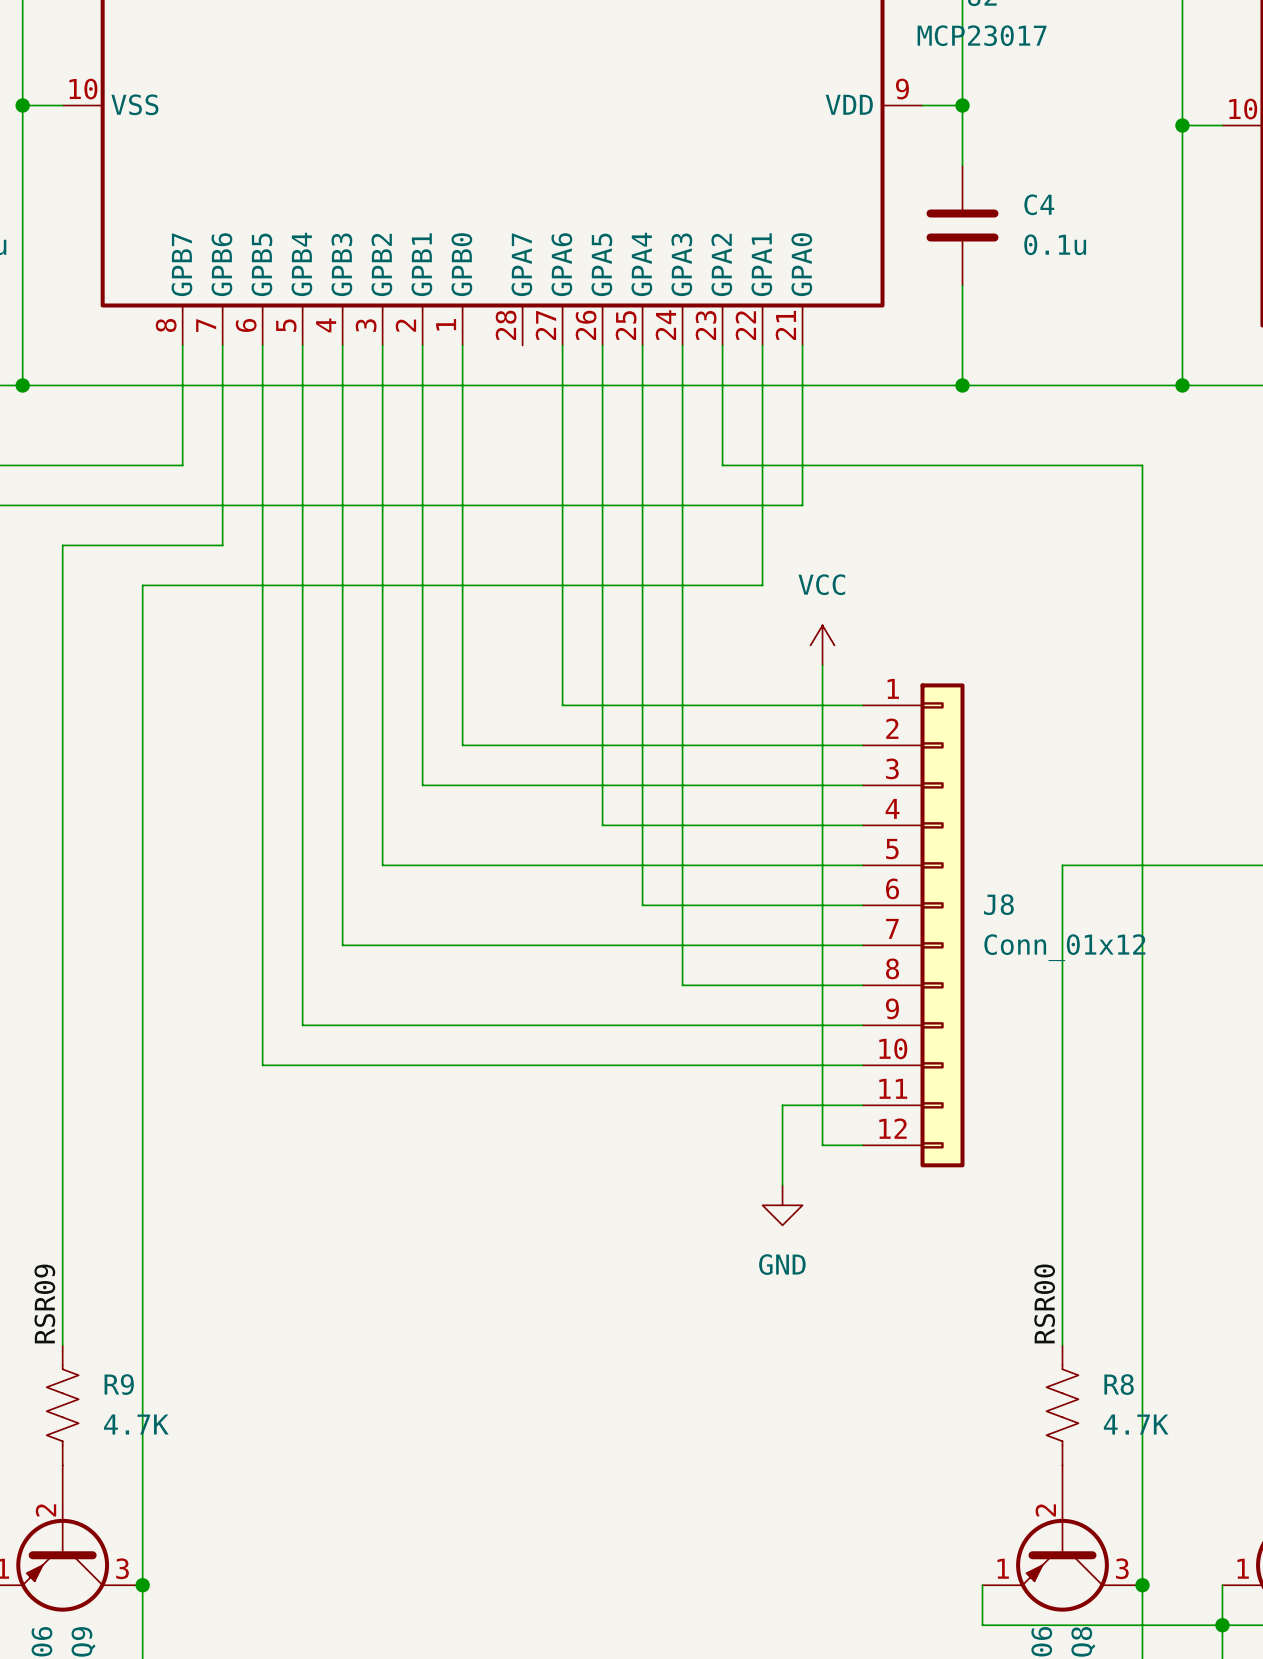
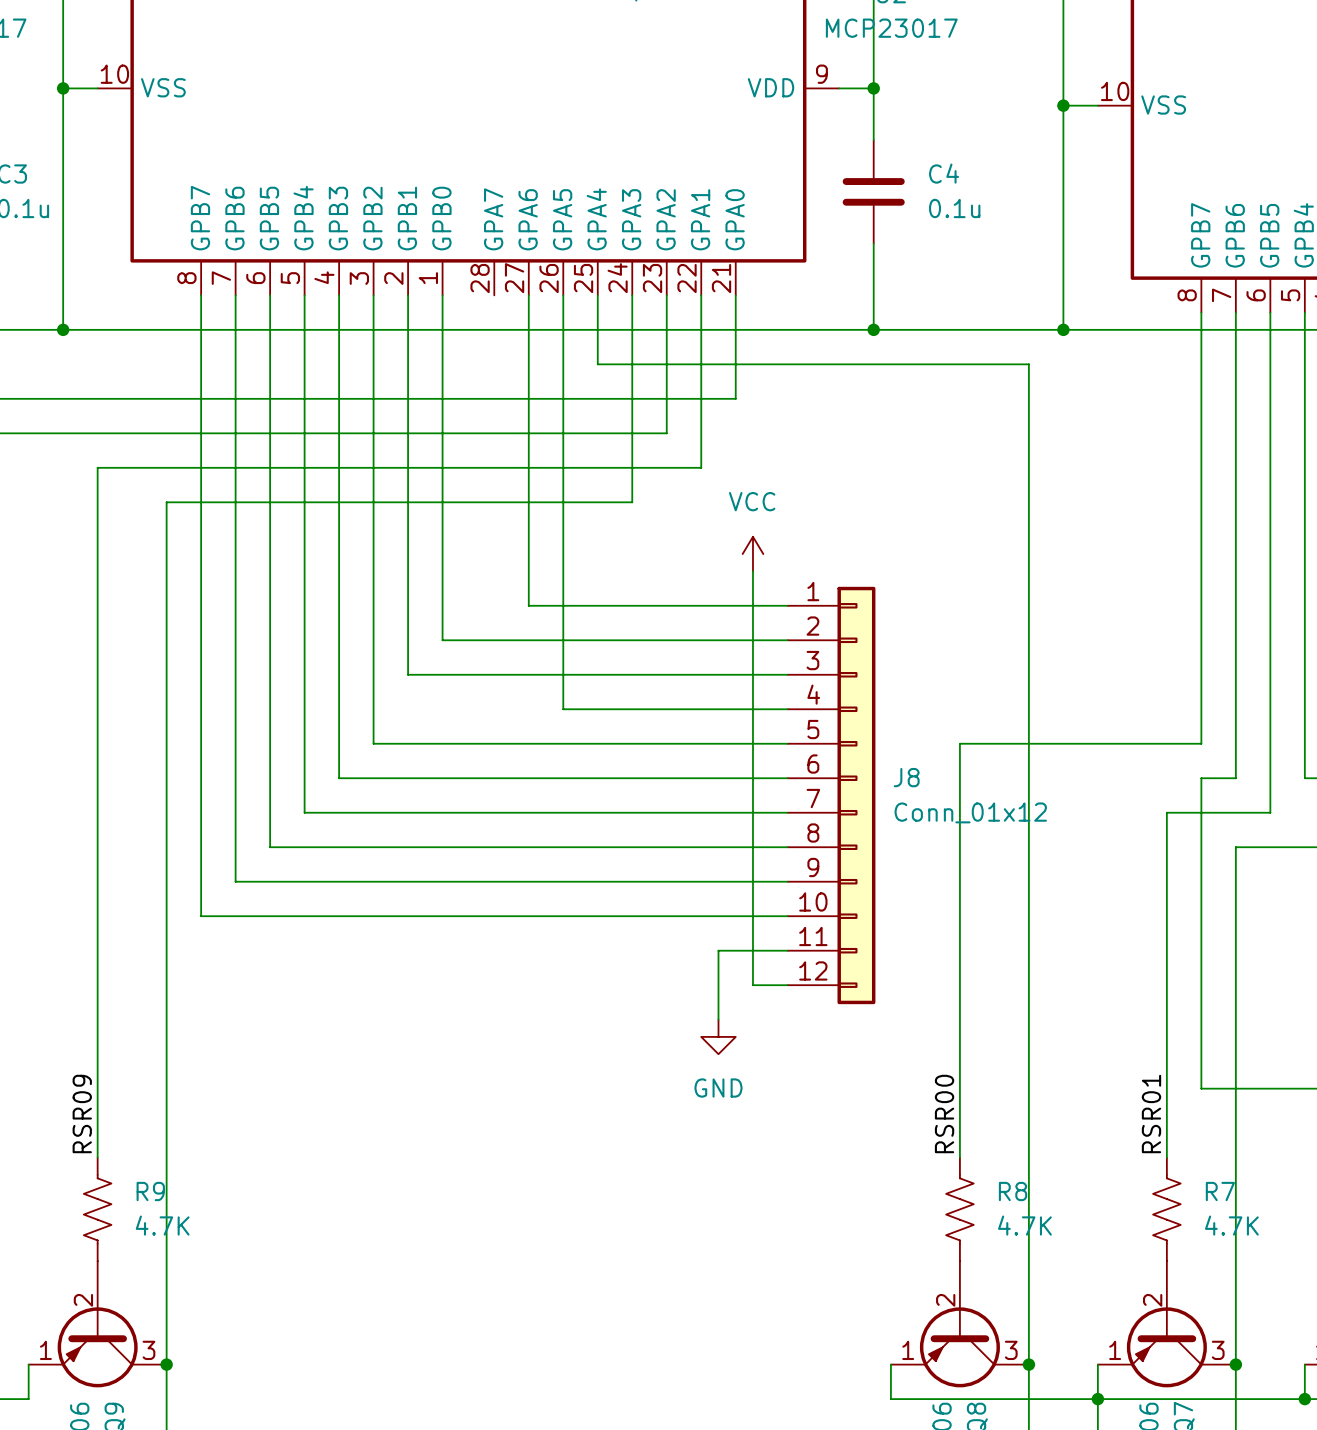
wire: (642, 425) (642, 905) -> (339, 778) (597, 778)
wire: (1142, 465) (802, 465) (802, 505) (722, 505) -> (1028, 398) (1028, 364) (597, 364)
wire: none -> (666, 433) (666, 398) (201, 398) (201, 916) (270, 916)
wire: (762, 545) (762, 585) (682, 585) (682, 985) -> (701, 467) (235, 467) (235, 881) (304, 881)
wire: (342, 905) (342, 945) -> (304, 812) (339, 812)
wire: (302, 945) (302, 1025) -> none
wire: (262, 985) (262, 1065) -> (270, 847) (632, 847)

